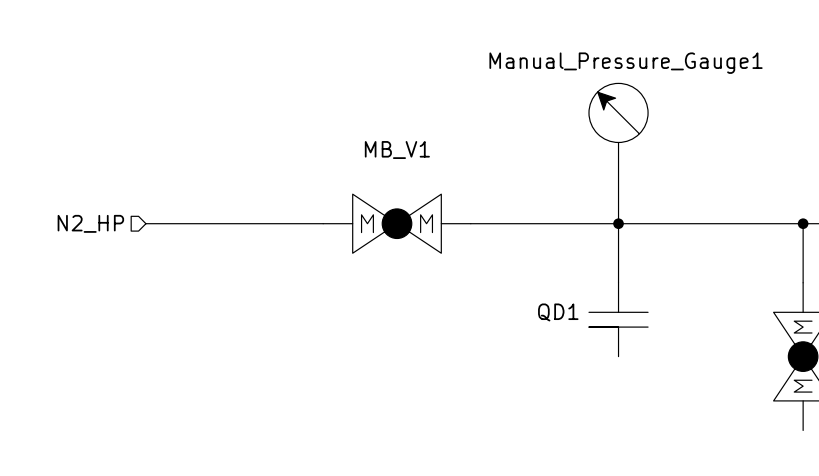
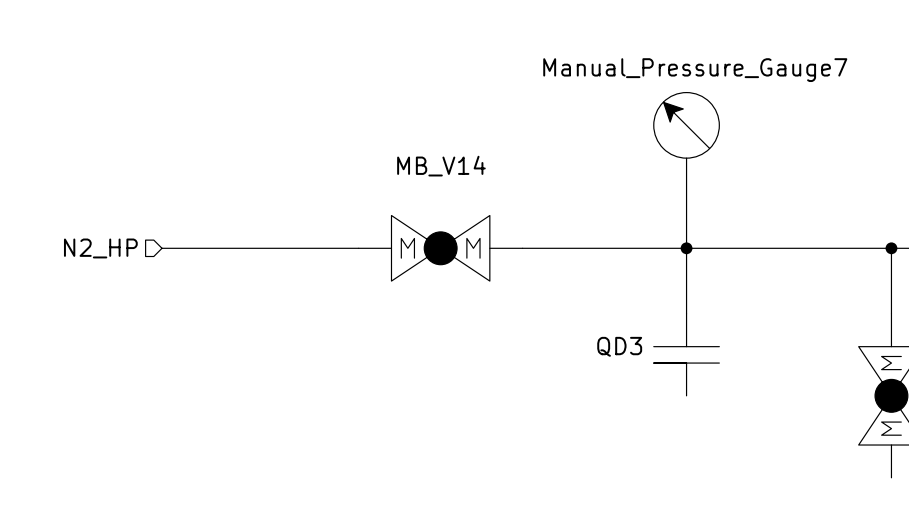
Manual_Pressure_Gauge1 name: Manual_Pressure_Gauge1 (626, 63) -> Manual_Pressure_Gauge7 (695, 70)
MB_V1 name: MB_V1 (397, 150) -> MB_V14 (441, 166)
QD1 name: QD1 (558, 312) -> QD3 (619, 346)

